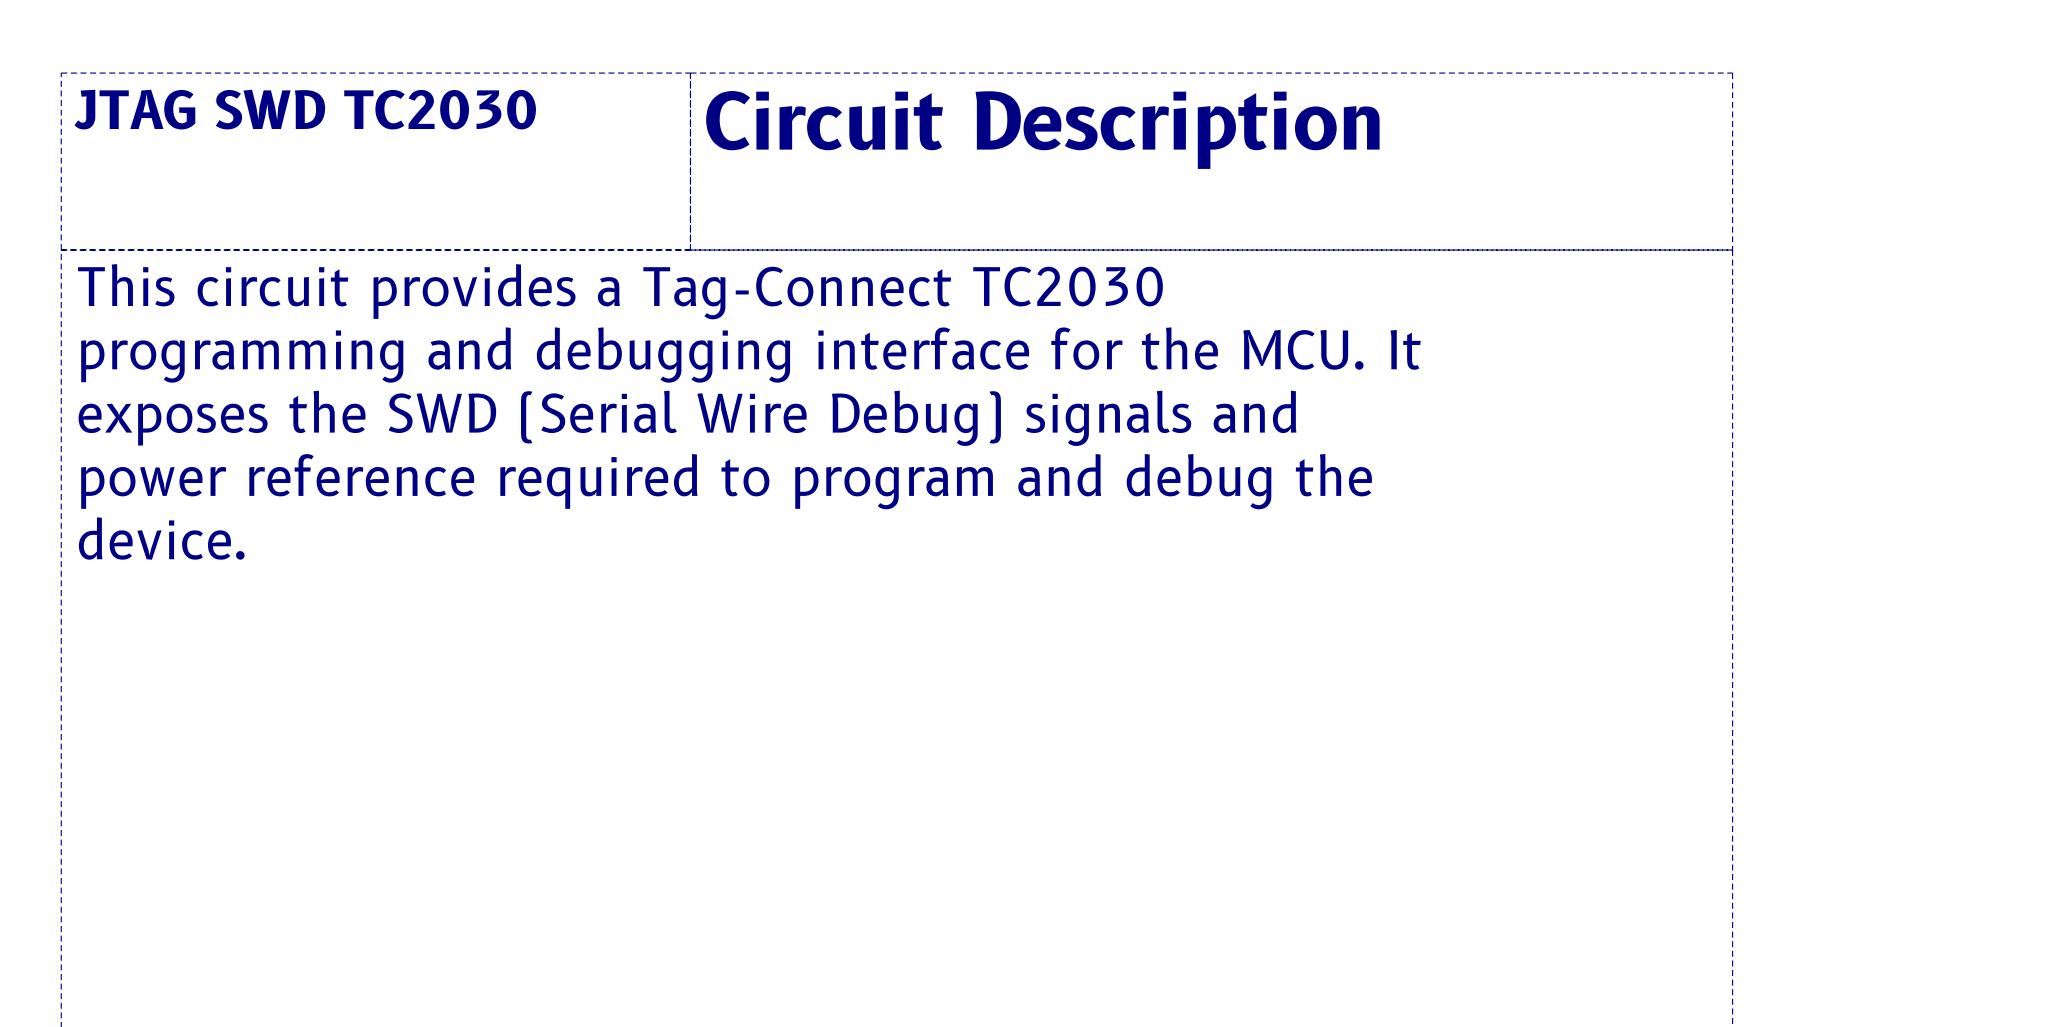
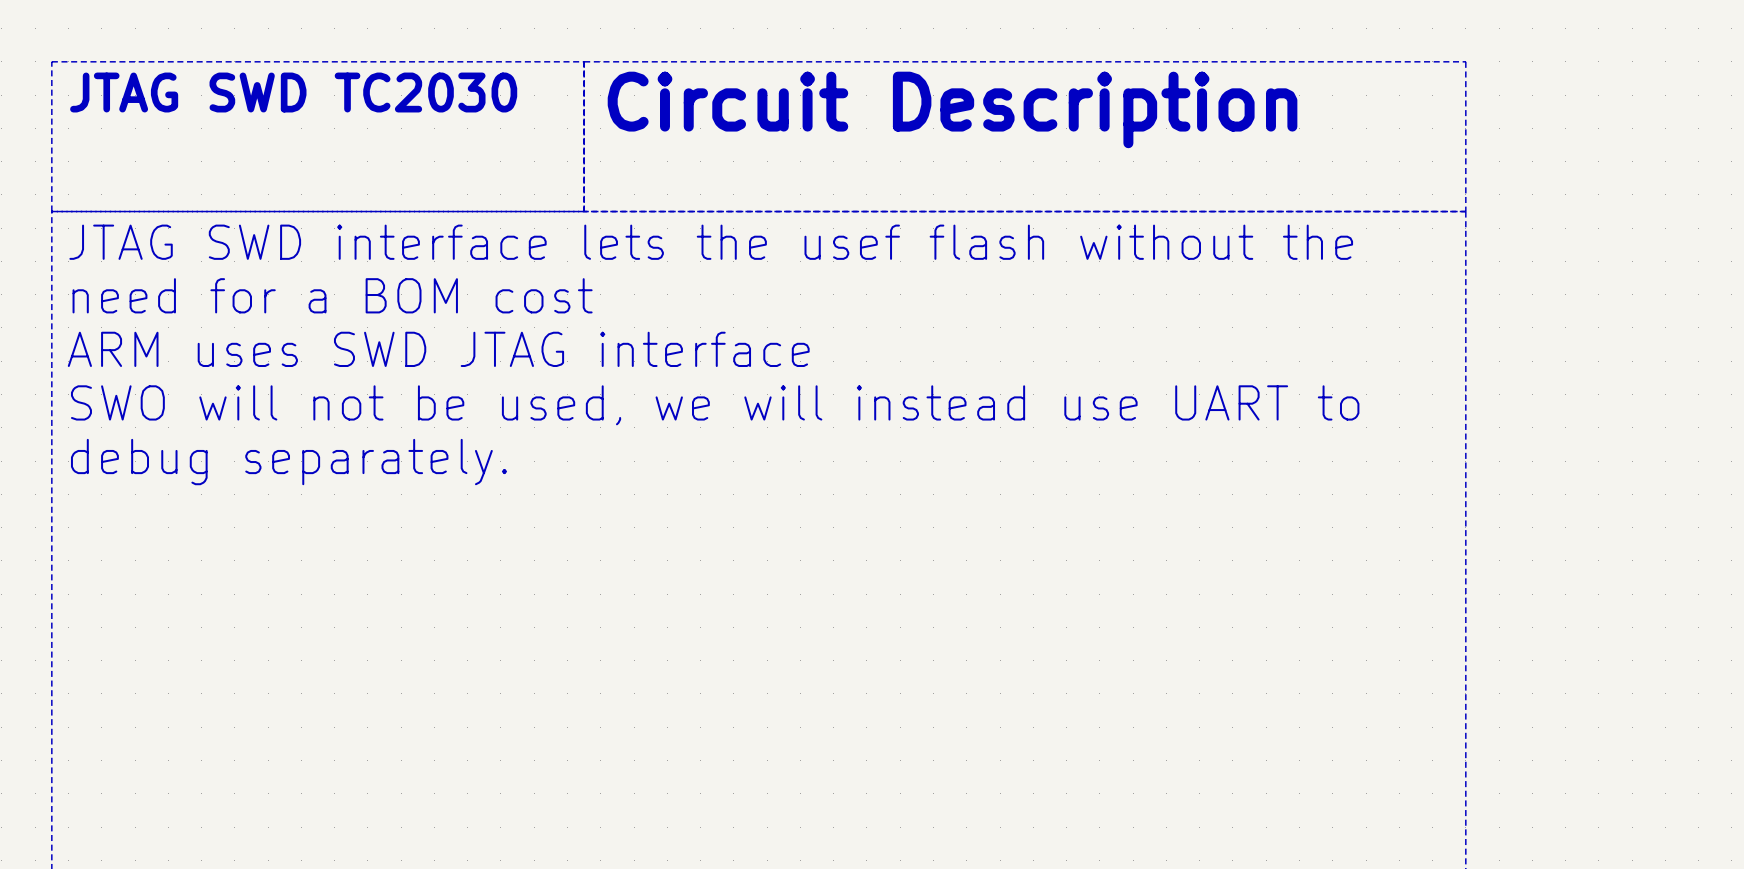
text: This circuit provides a Tag-Connect TC2030 (620, 291) -> JTAG SWD interface lets the usef flash without the (711, 242)
text: programming and debugging interface for the MCU. It (750, 355) -> need for a BOM cost (332, 295)
text: exposes the SWD (Serial Wire Debug) signals and (687, 418) -> ARM uses SWD JTAG interface (438, 349)
text: power reference required to program and debug the (726, 481) -> SWO will not be used, we will instead use UART to (715, 405)
text: device. (161, 538) -> debug separately. (289, 462)

